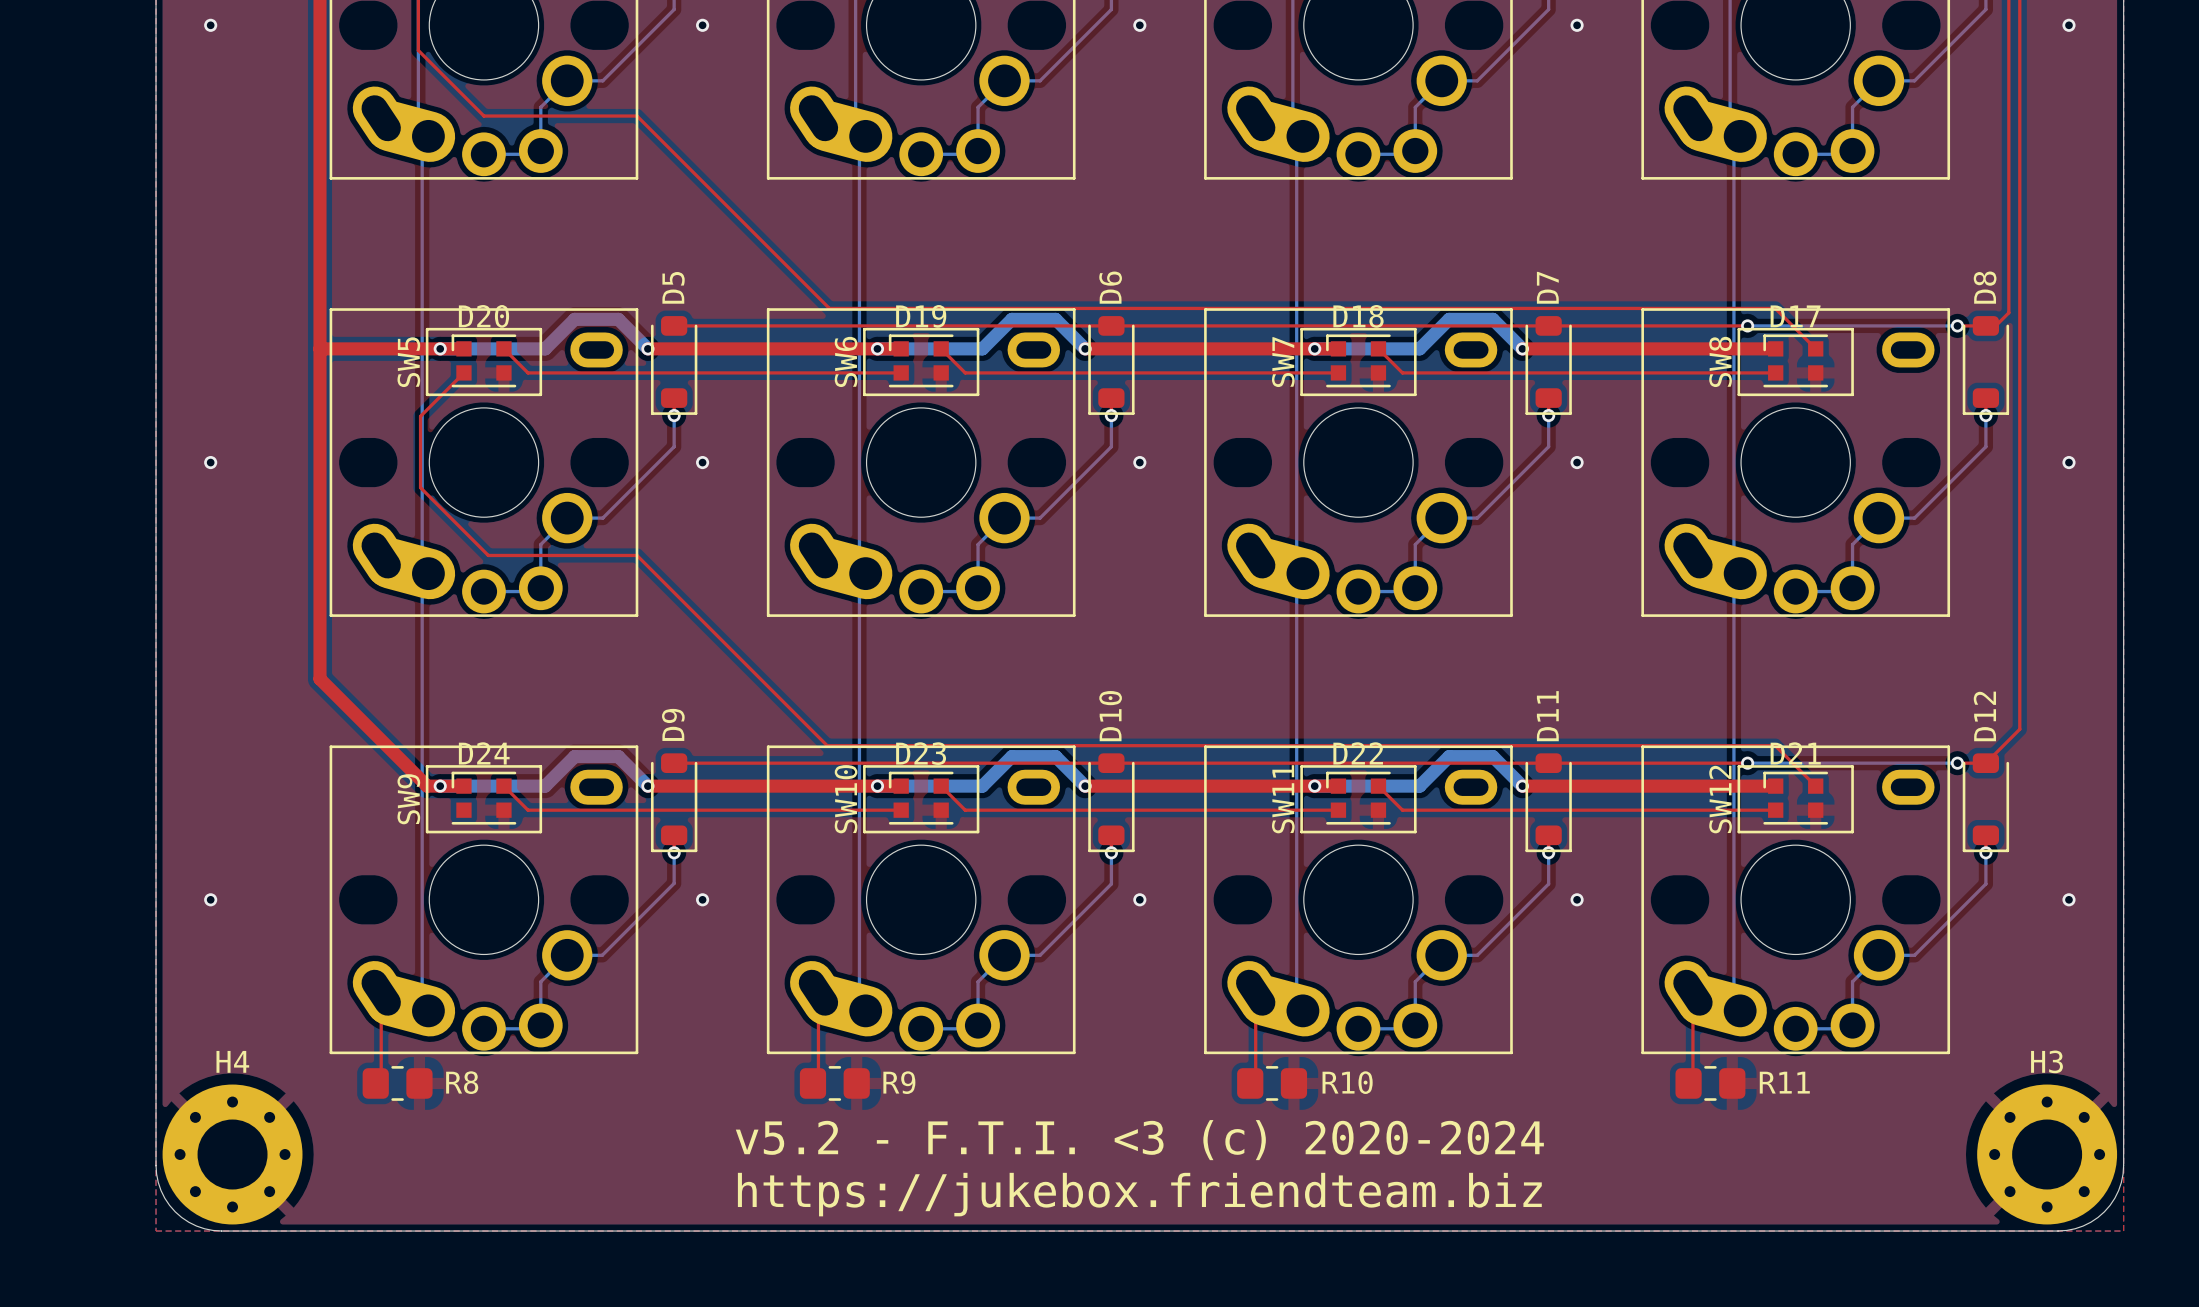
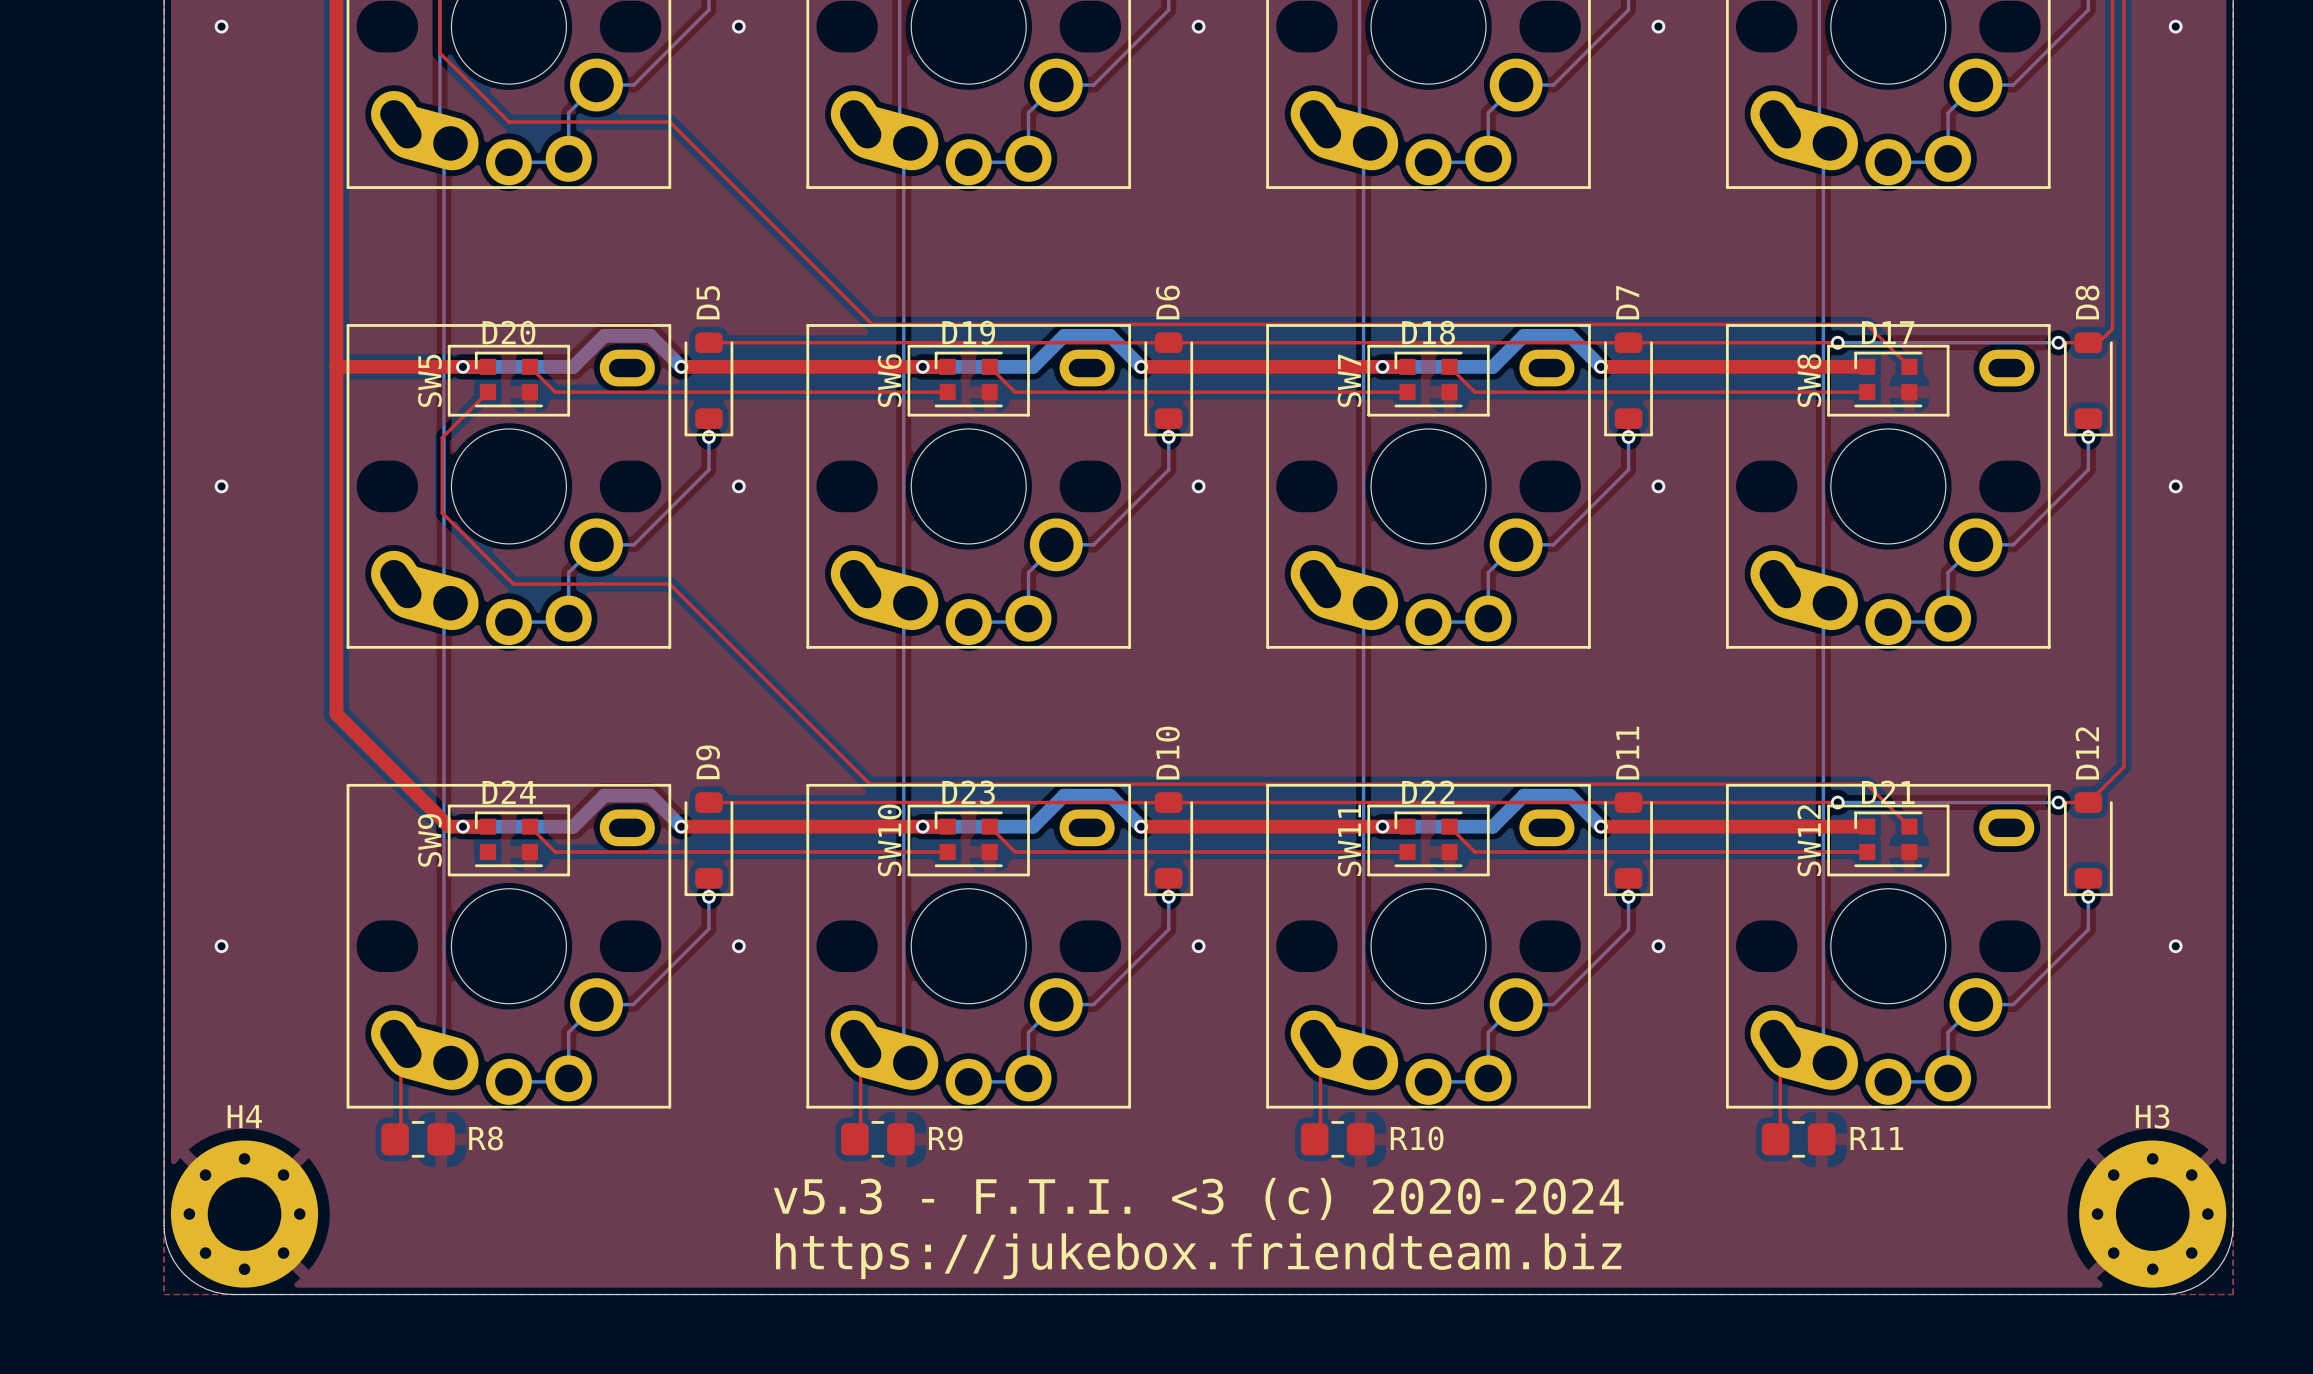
text: v5.2 - F.T.I. <3 (c) 2020-2024 (1139, 1140) -> v5.3 - F.T.I. <3 (c) 2020-2024 (1198, 1198)

